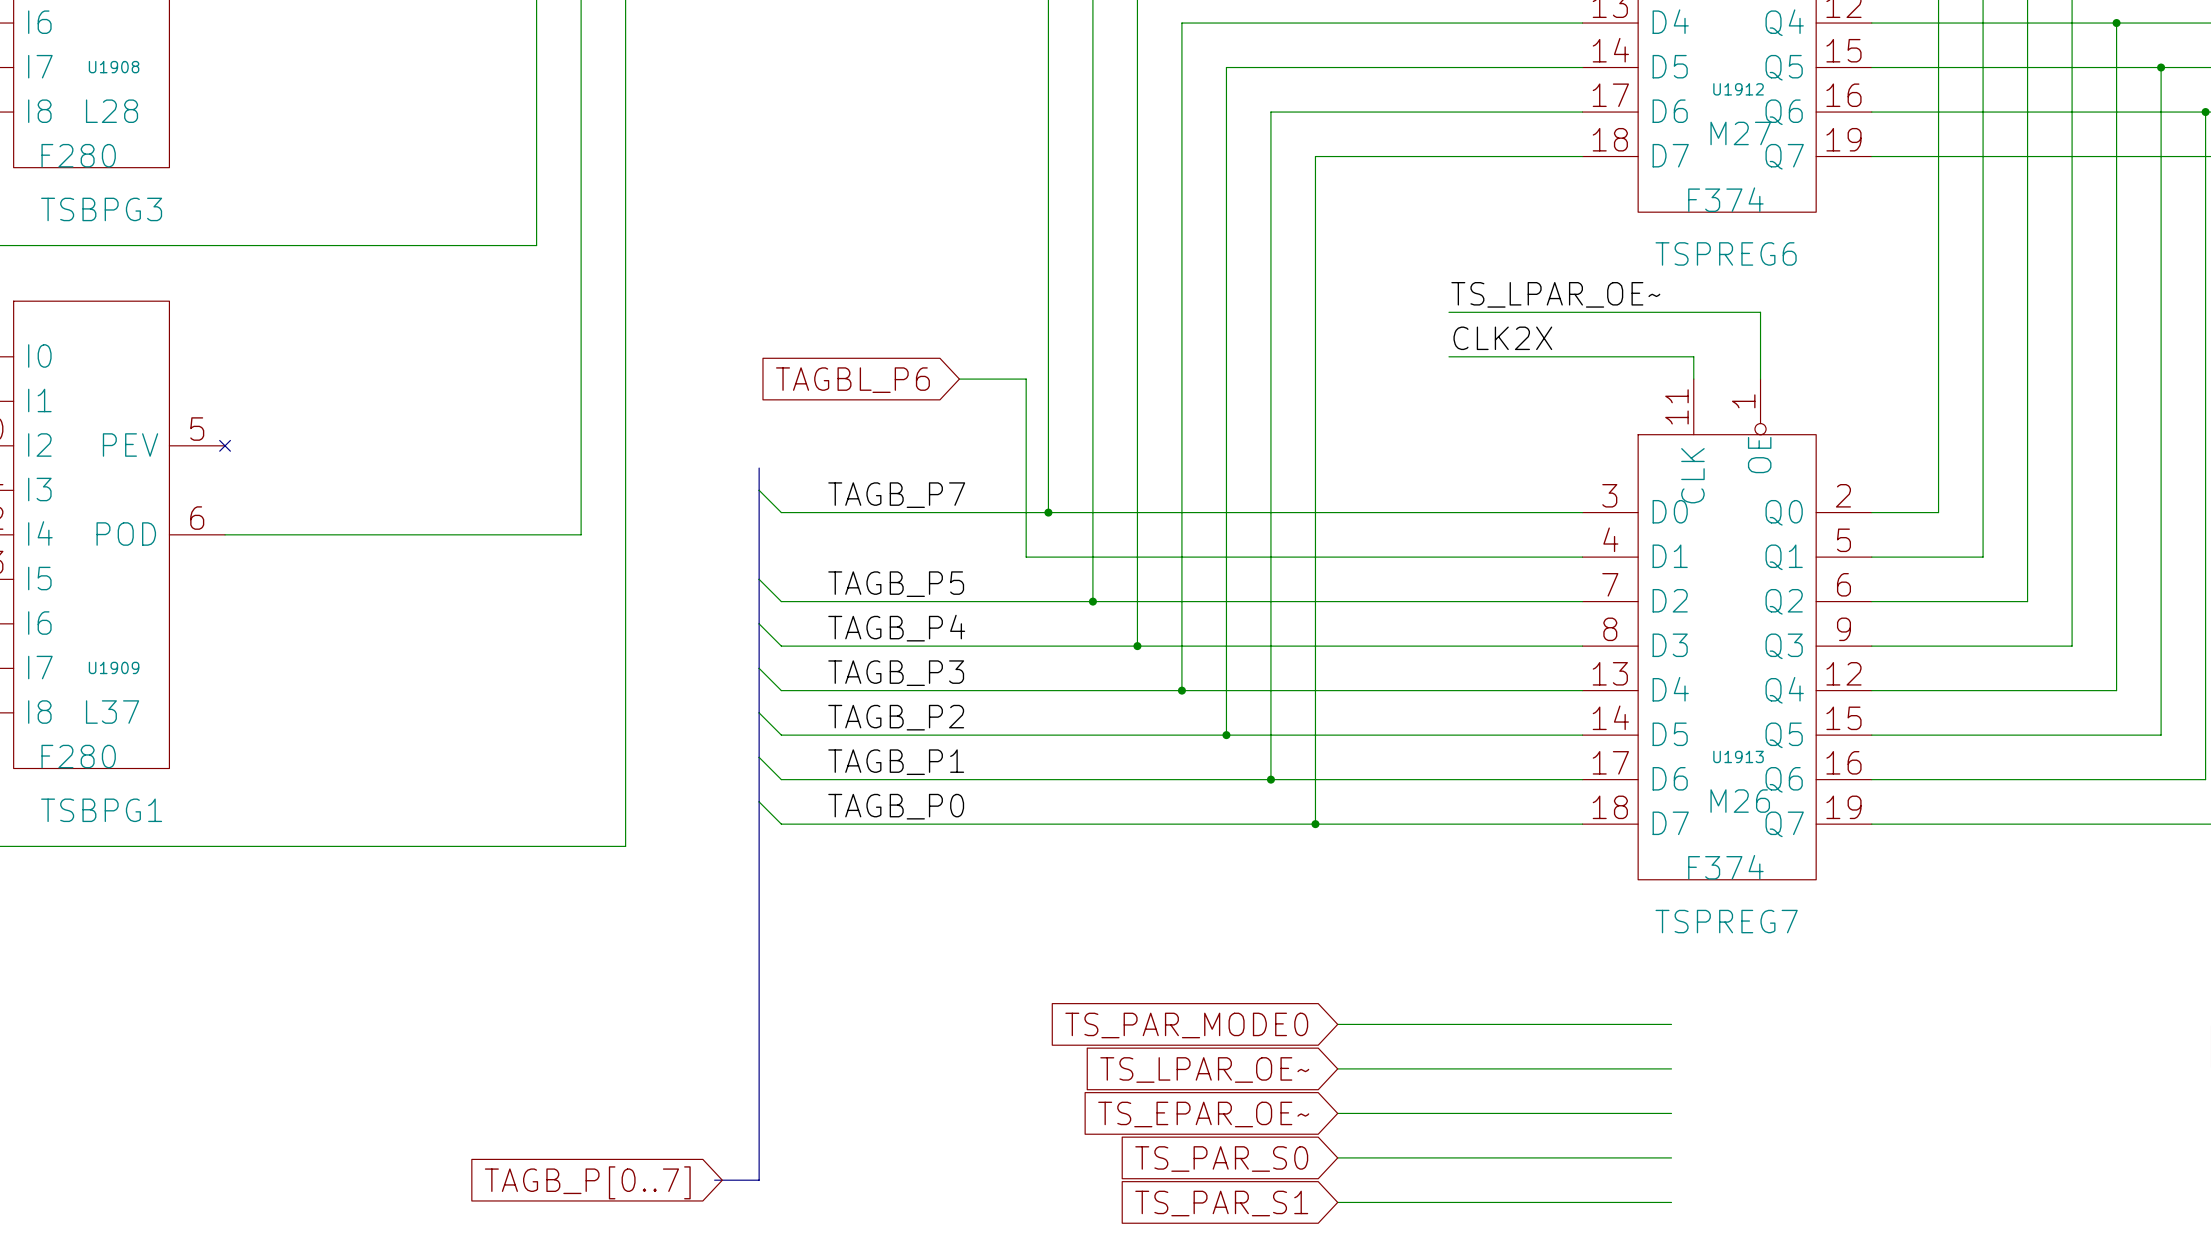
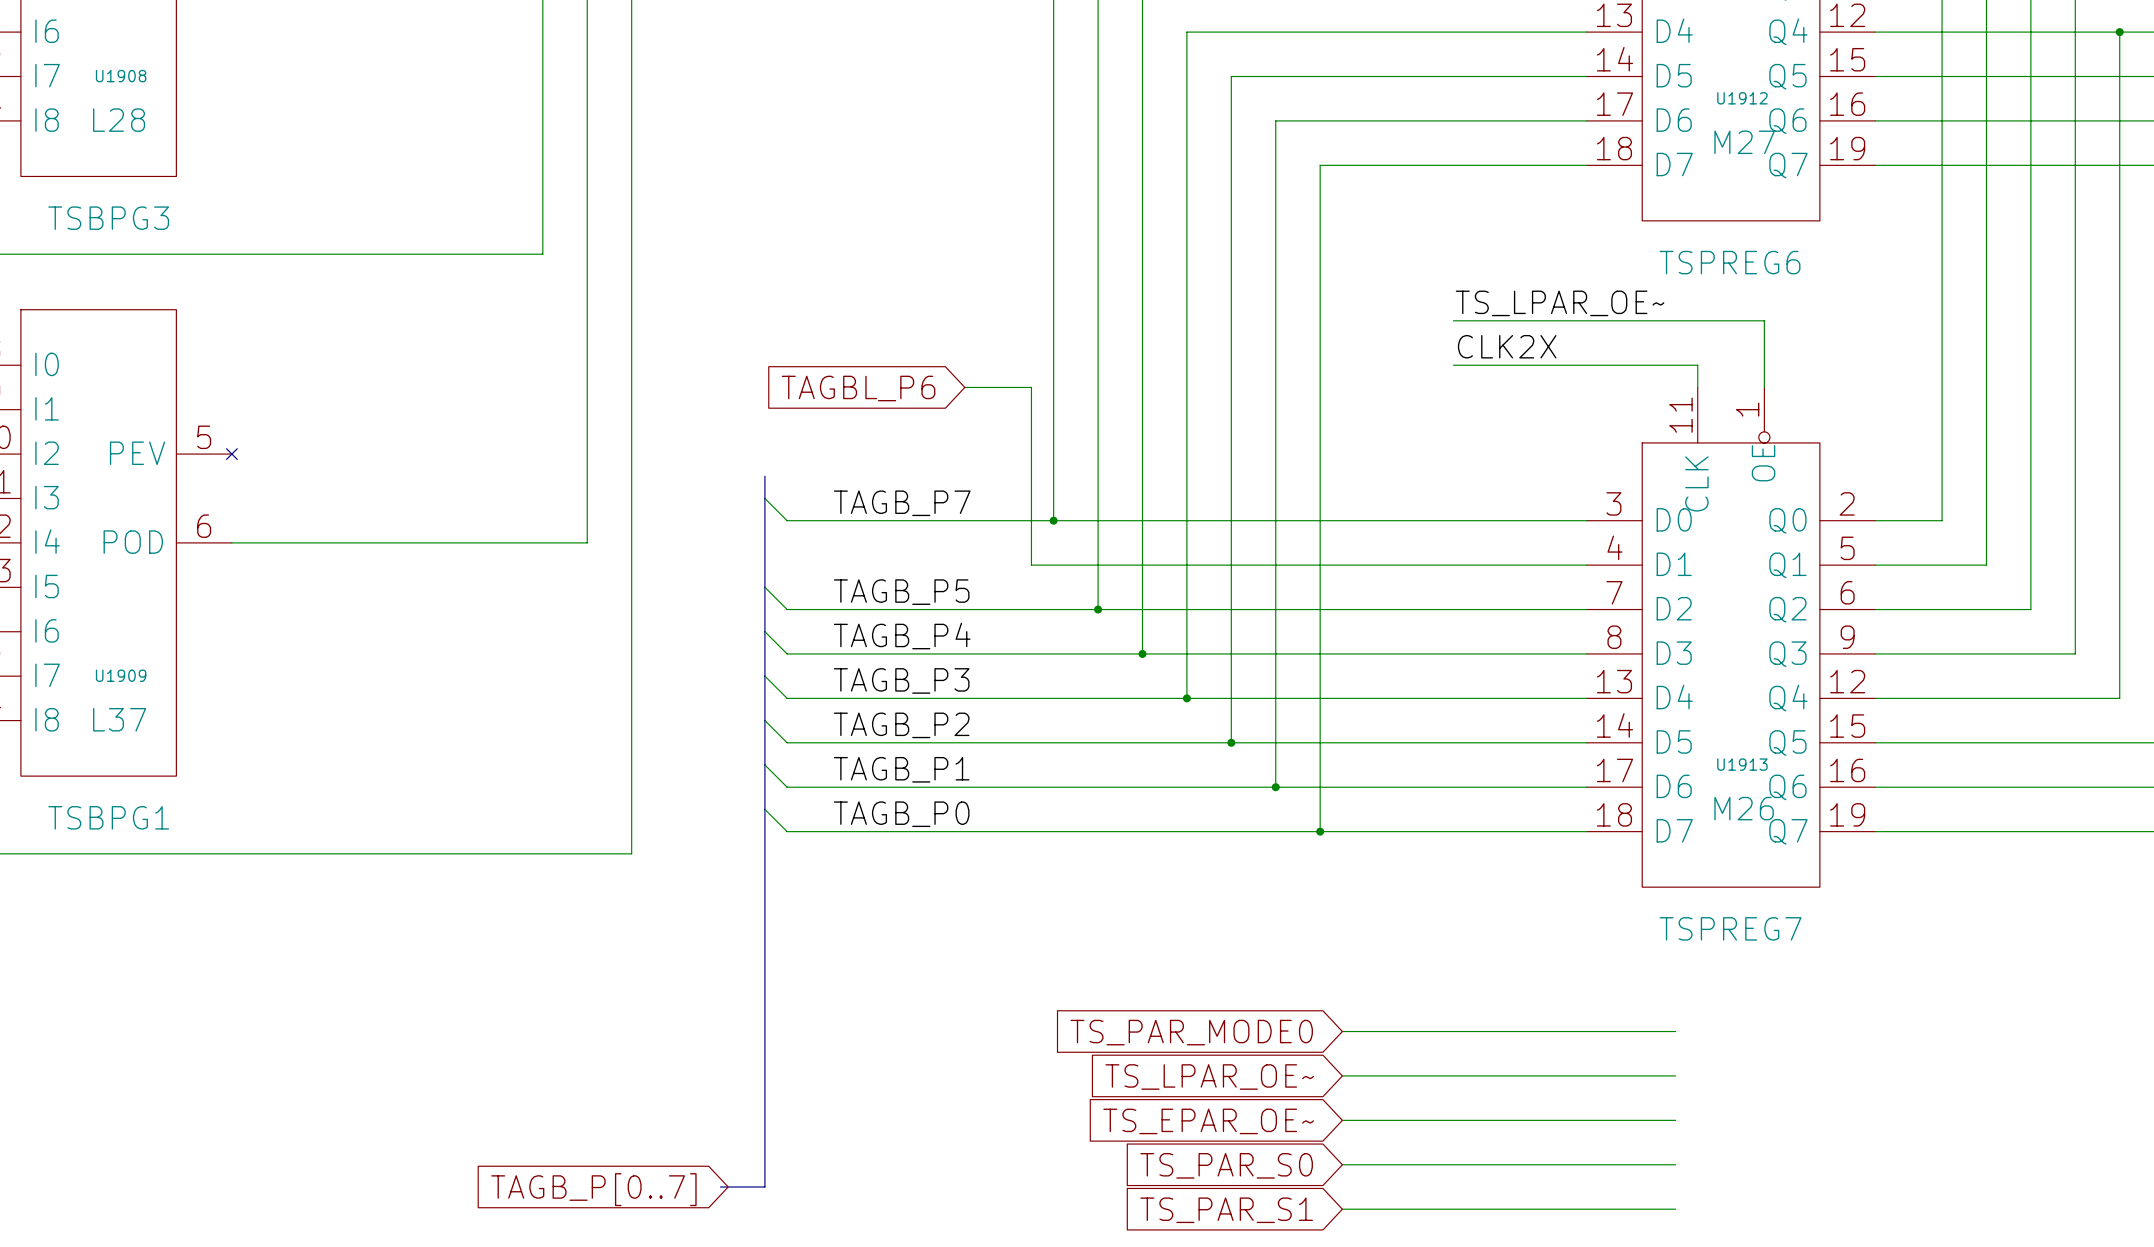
U1908 value: F280 (78, 155) -> none
U1912 value: F374 (1725, 199) -> none
U1909 value: F280 (78, 756) -> none
U1913 value: F374 (1725, 867) -> none

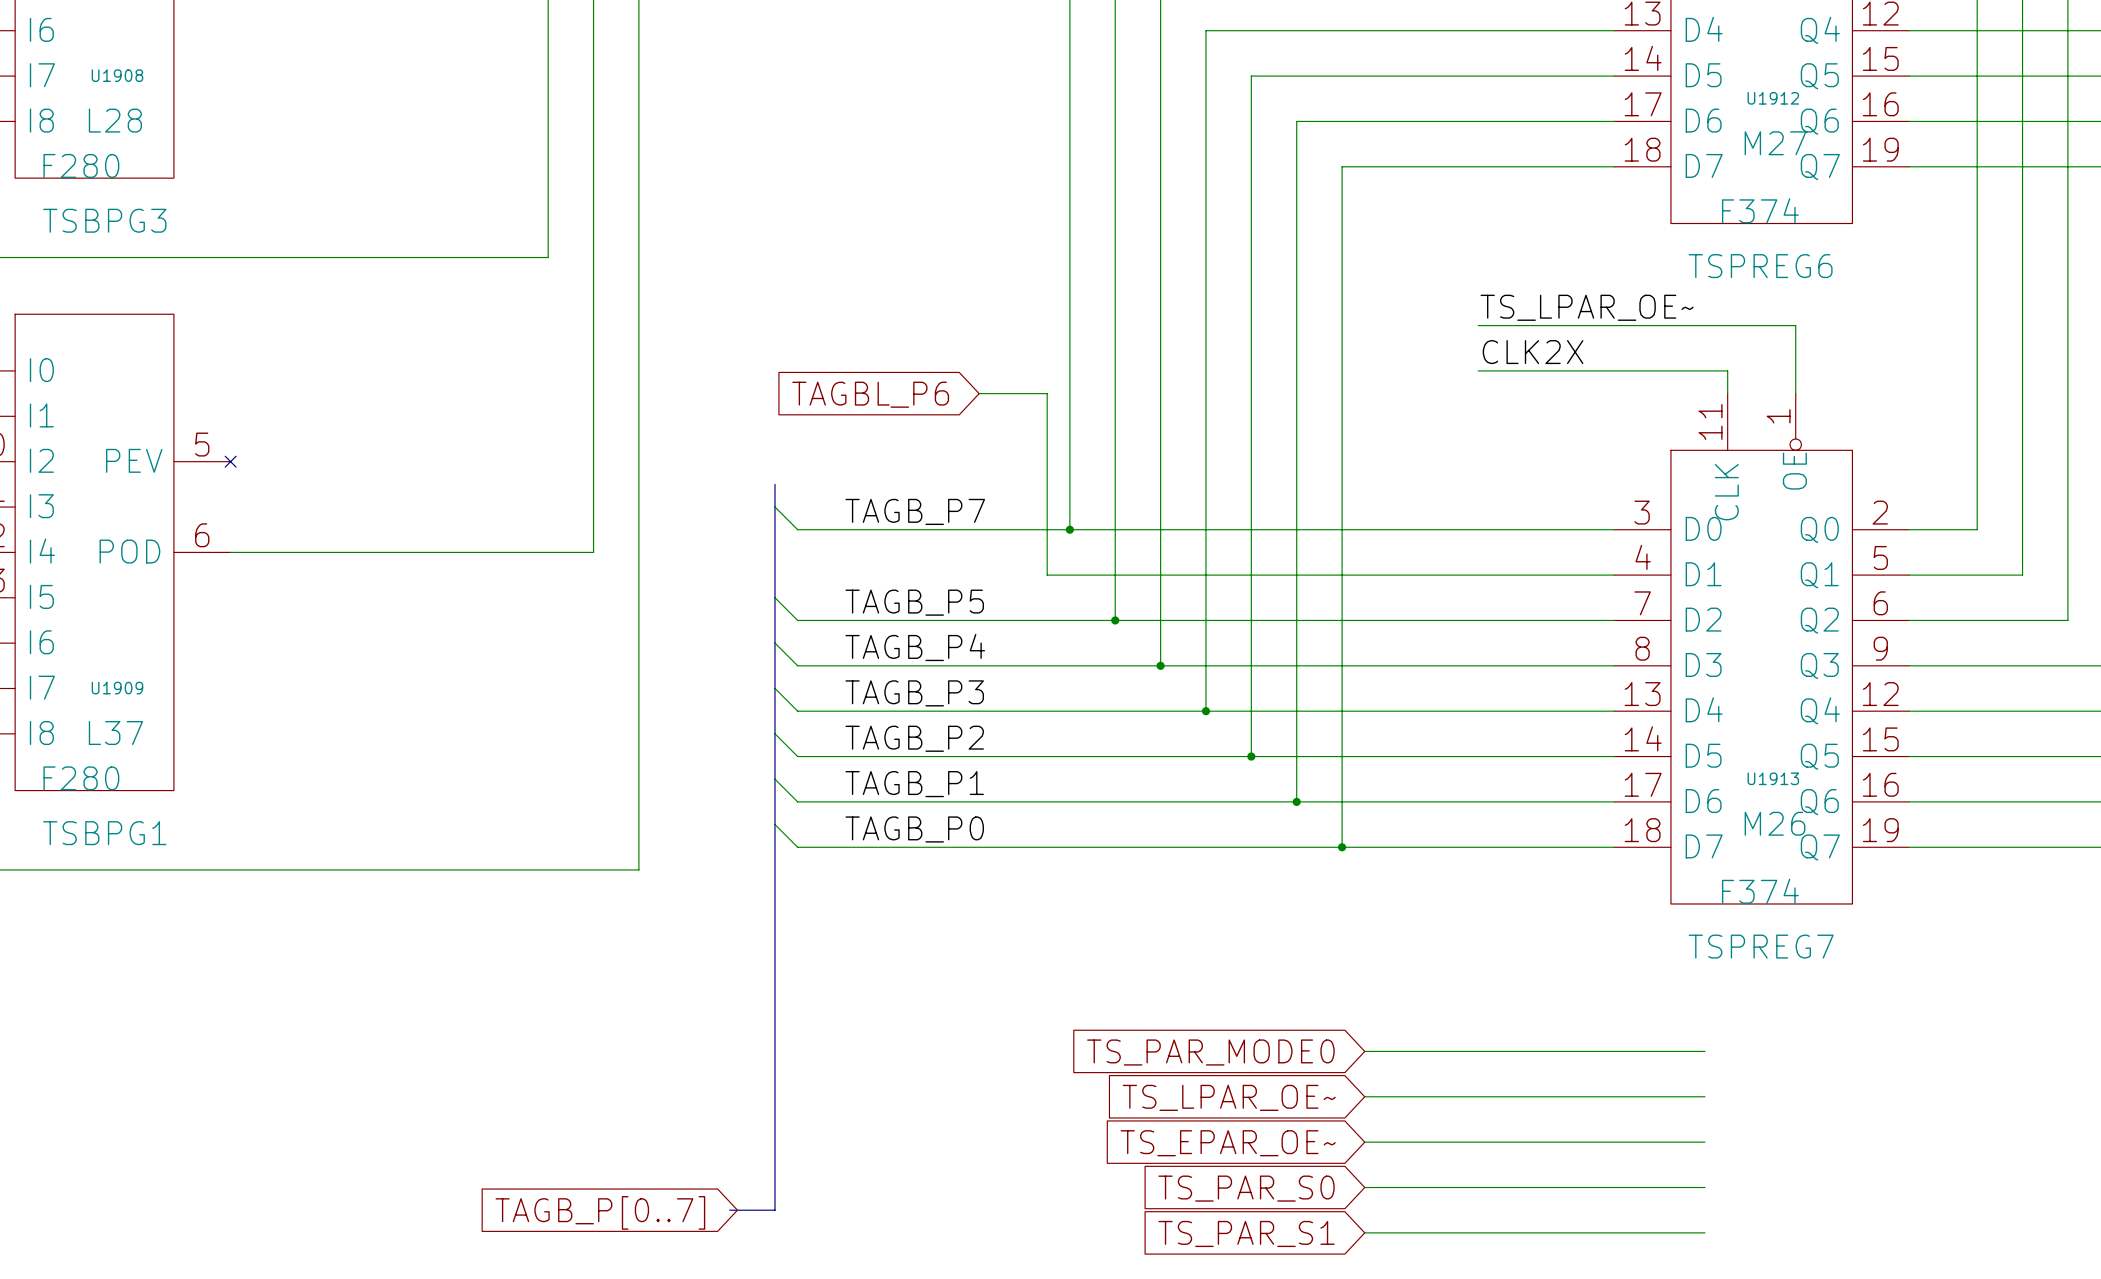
U1908 value: none -> F280 (81, 165)
U1912 value: none -> F374 (1760, 210)
U1909 value: none -> F280 (81, 778)
U1913 value: none -> F374 (1760, 891)

